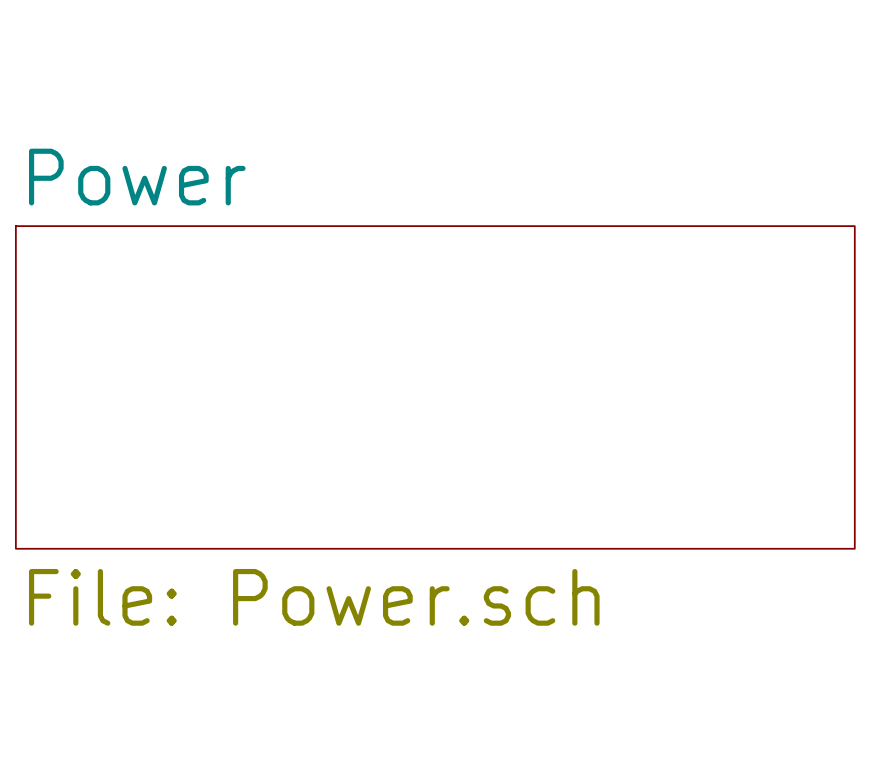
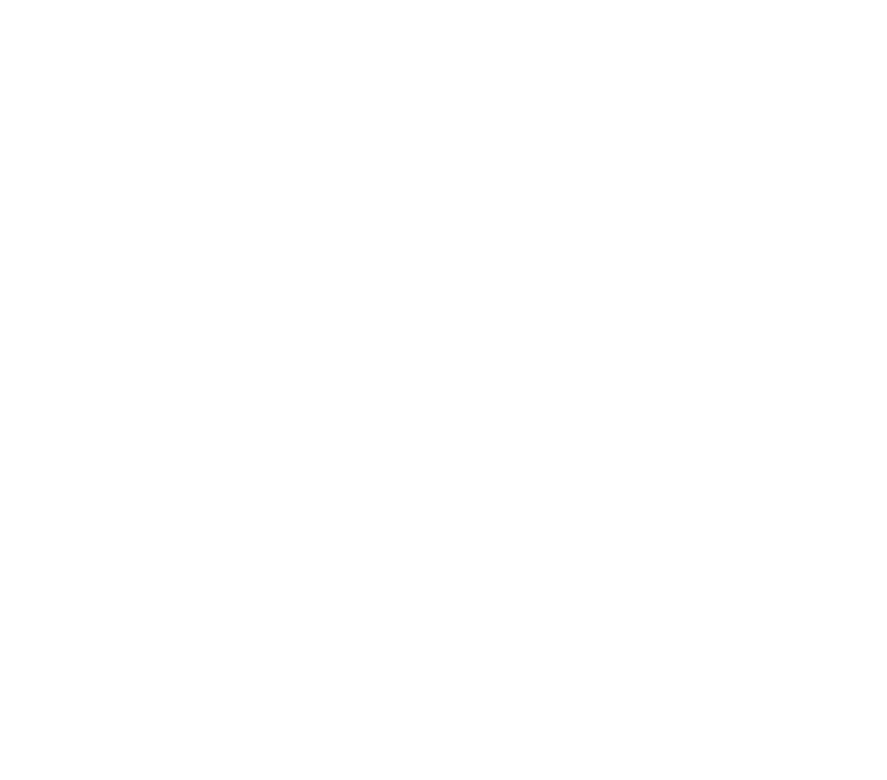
sheet Power: File: Power.sch (435, 387) -> none

